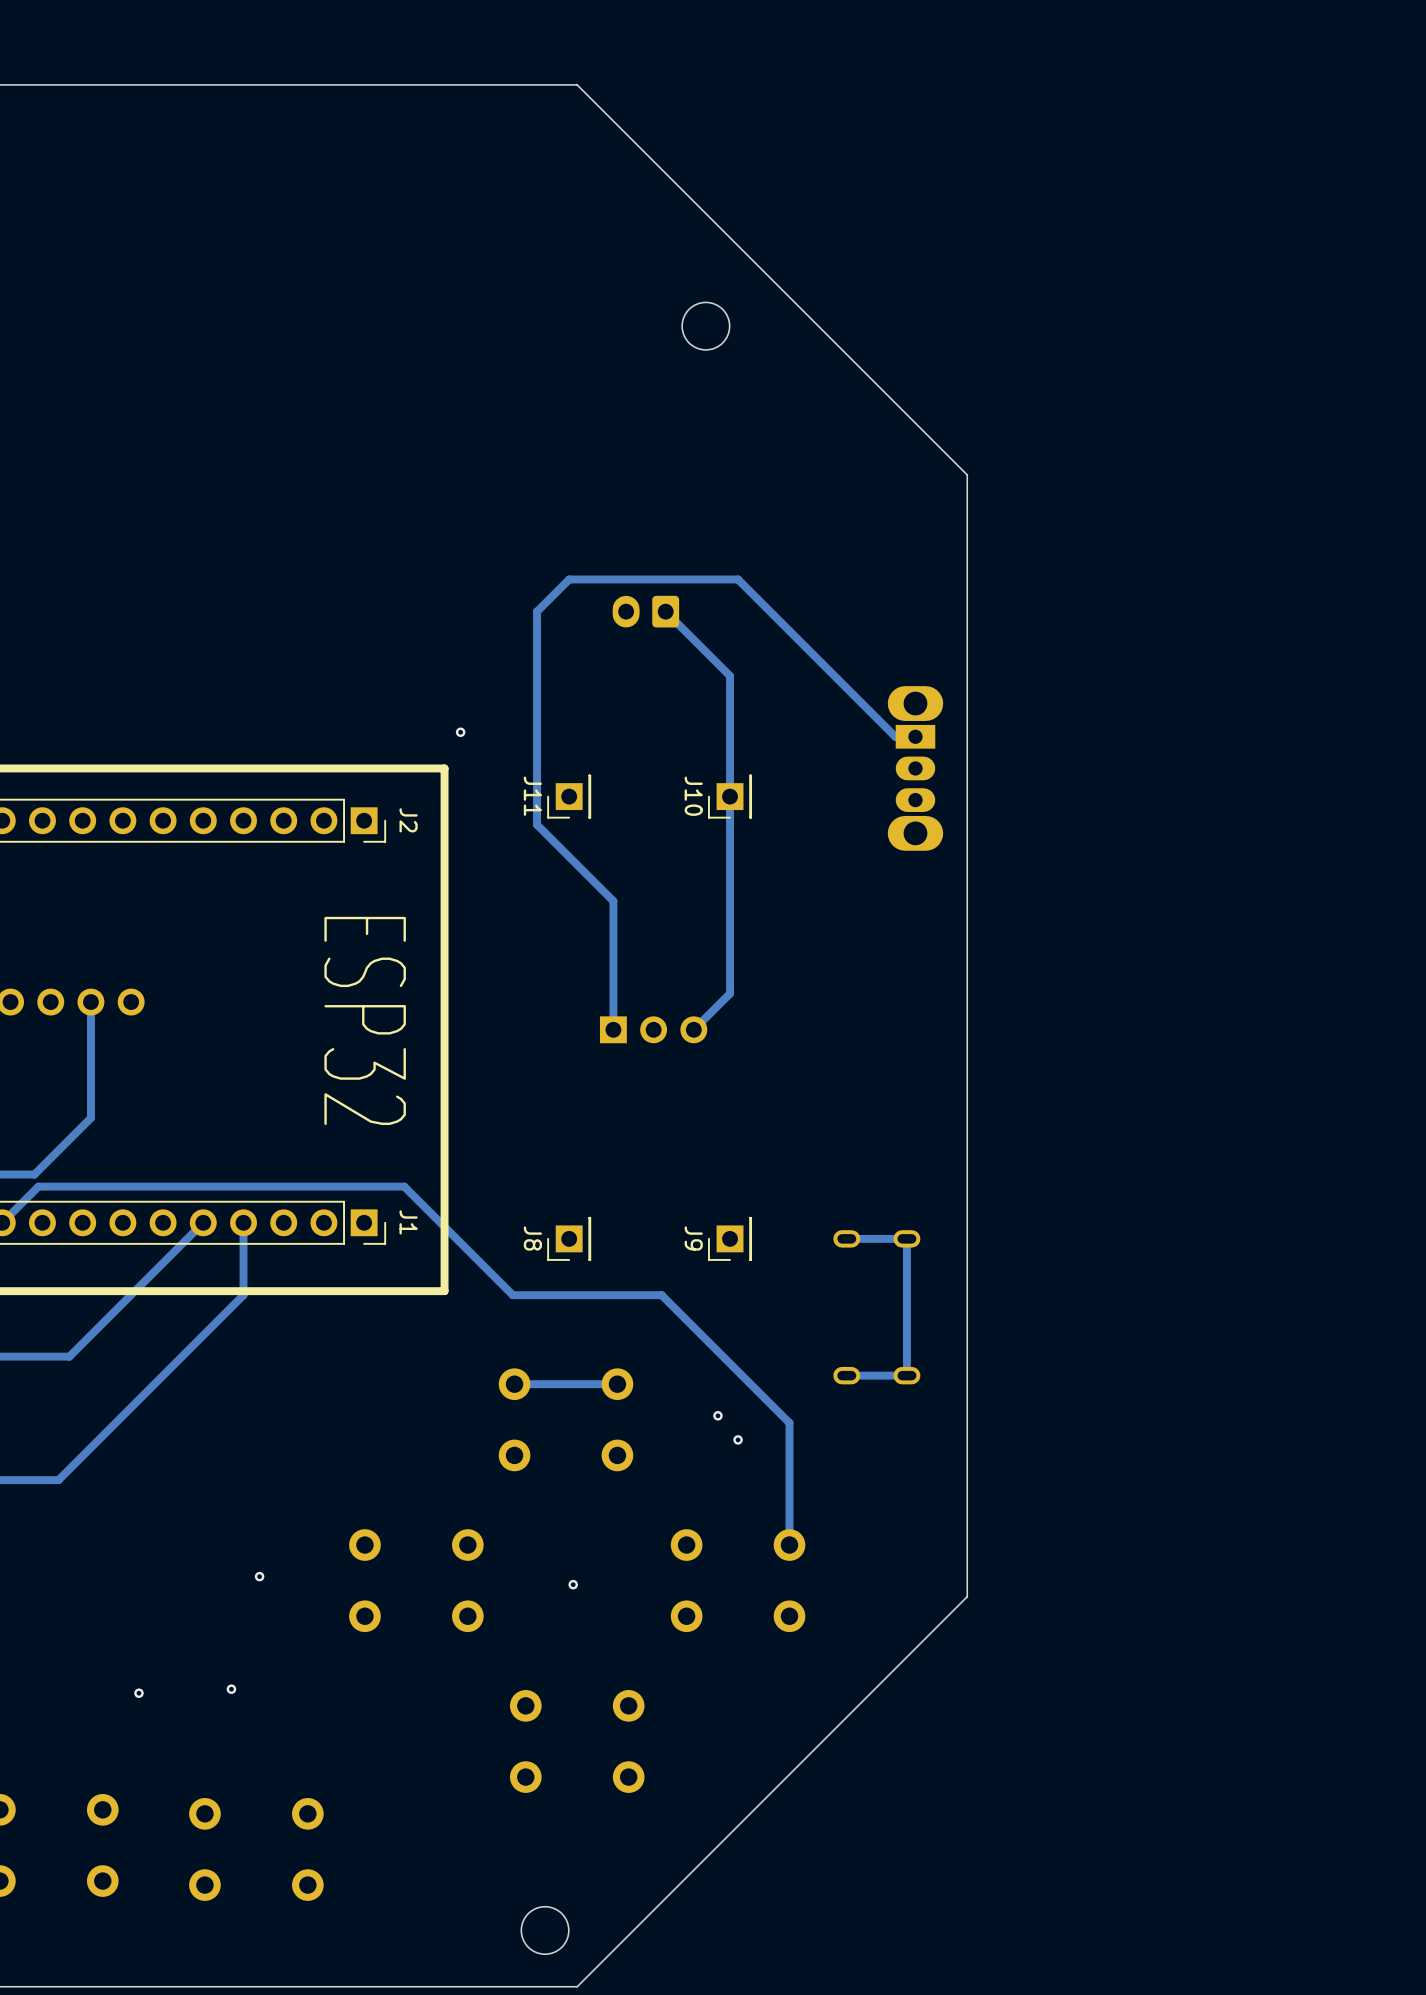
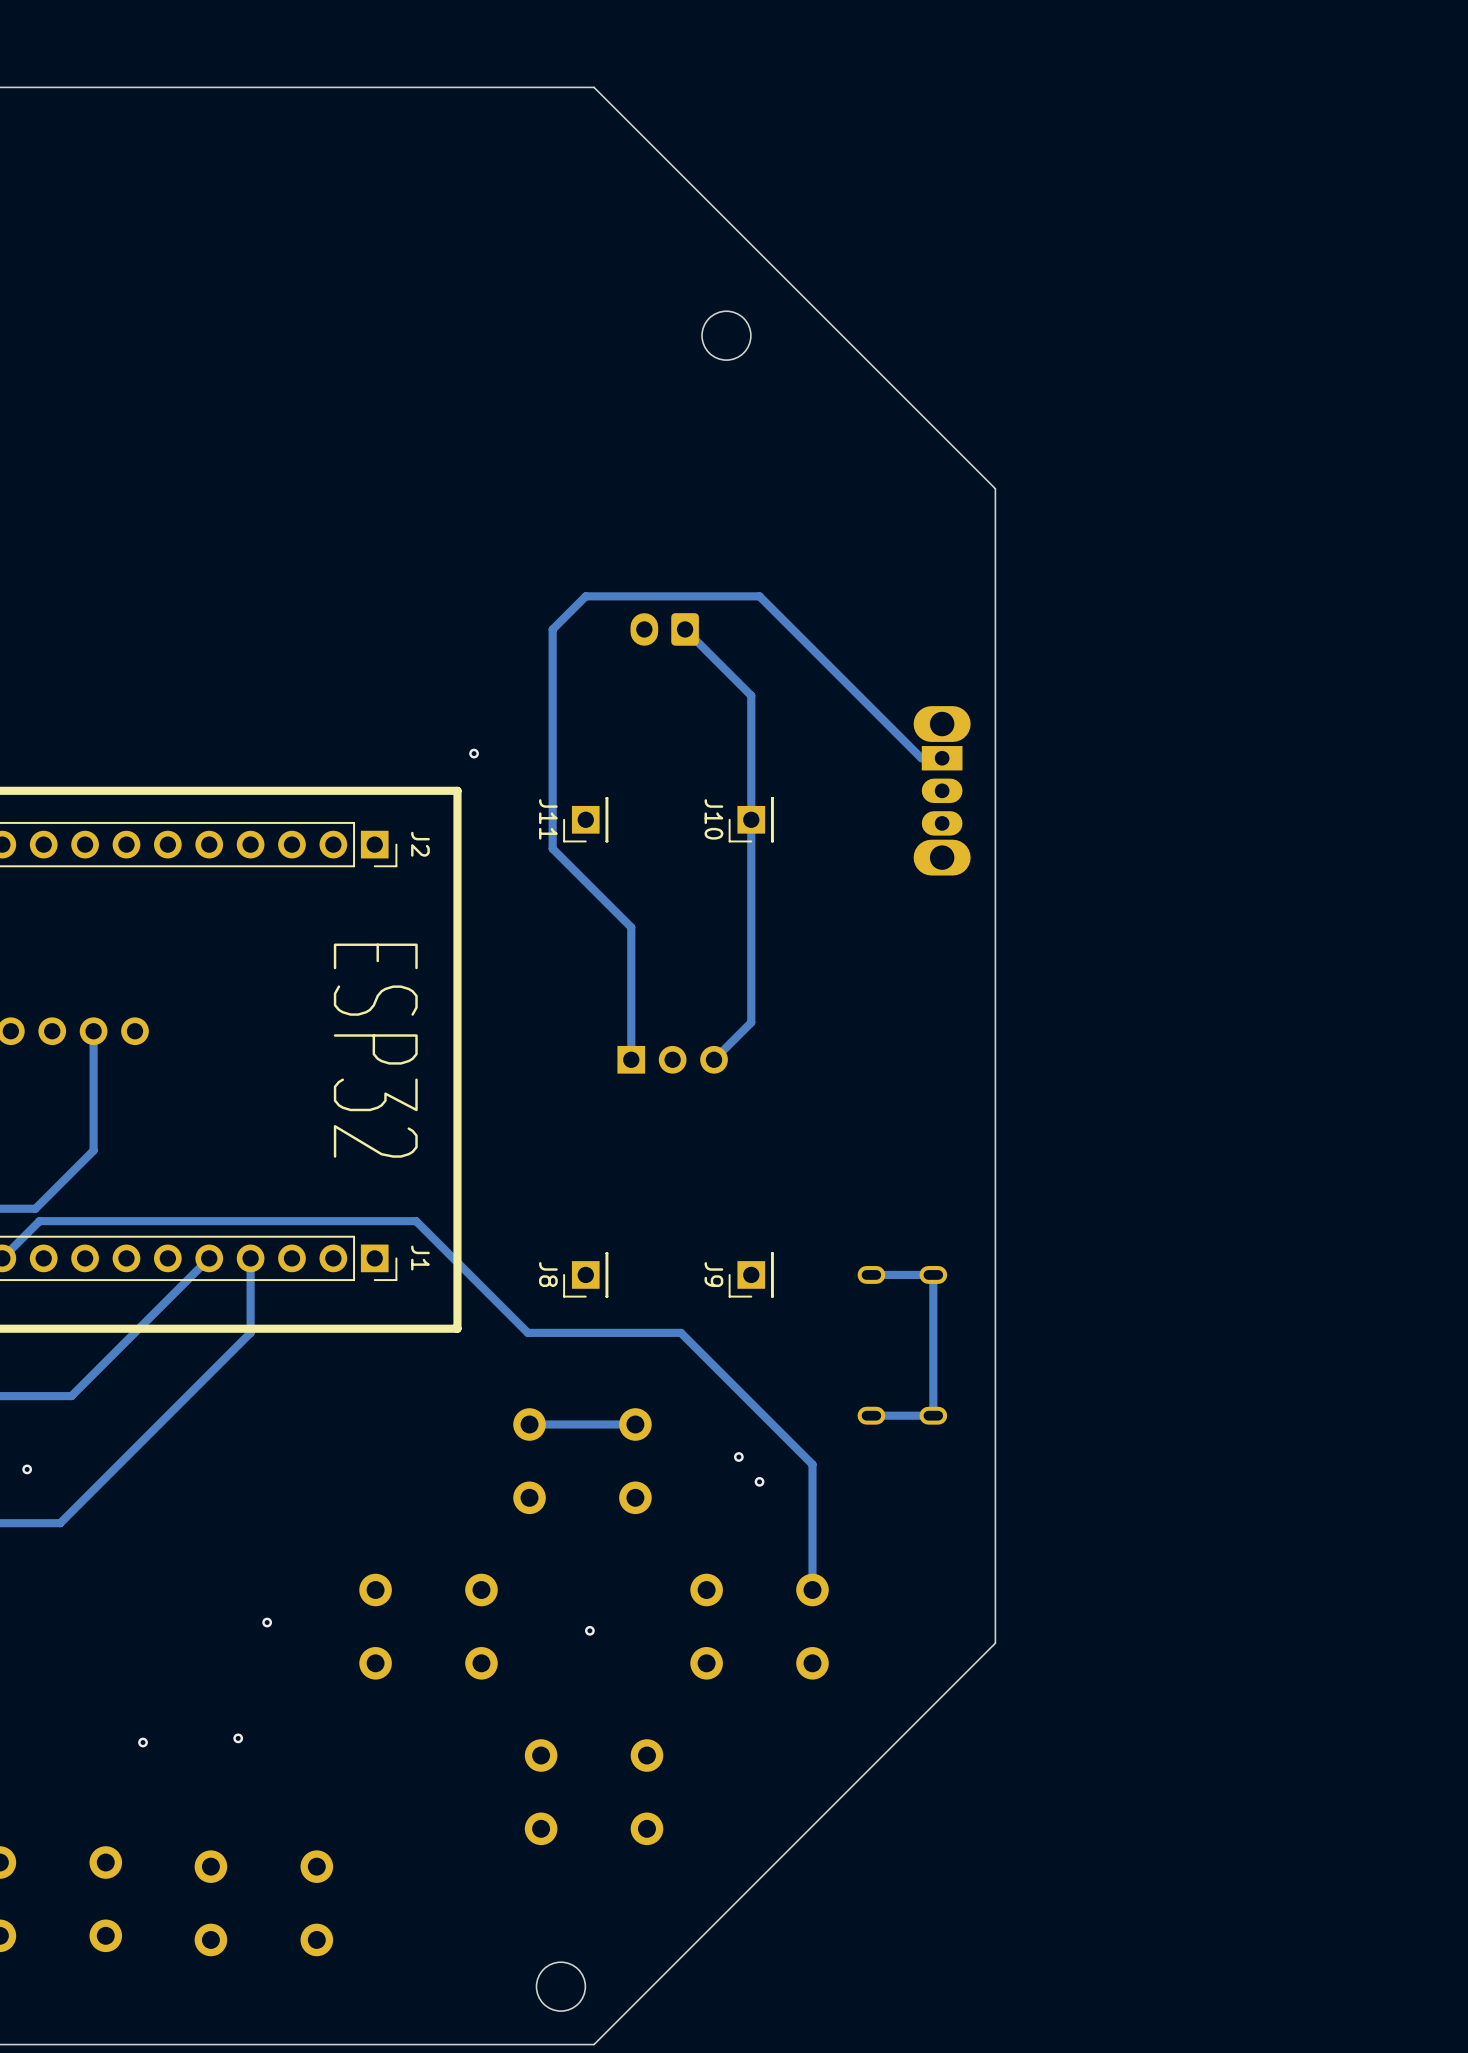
via: none -> (27, 1469)

